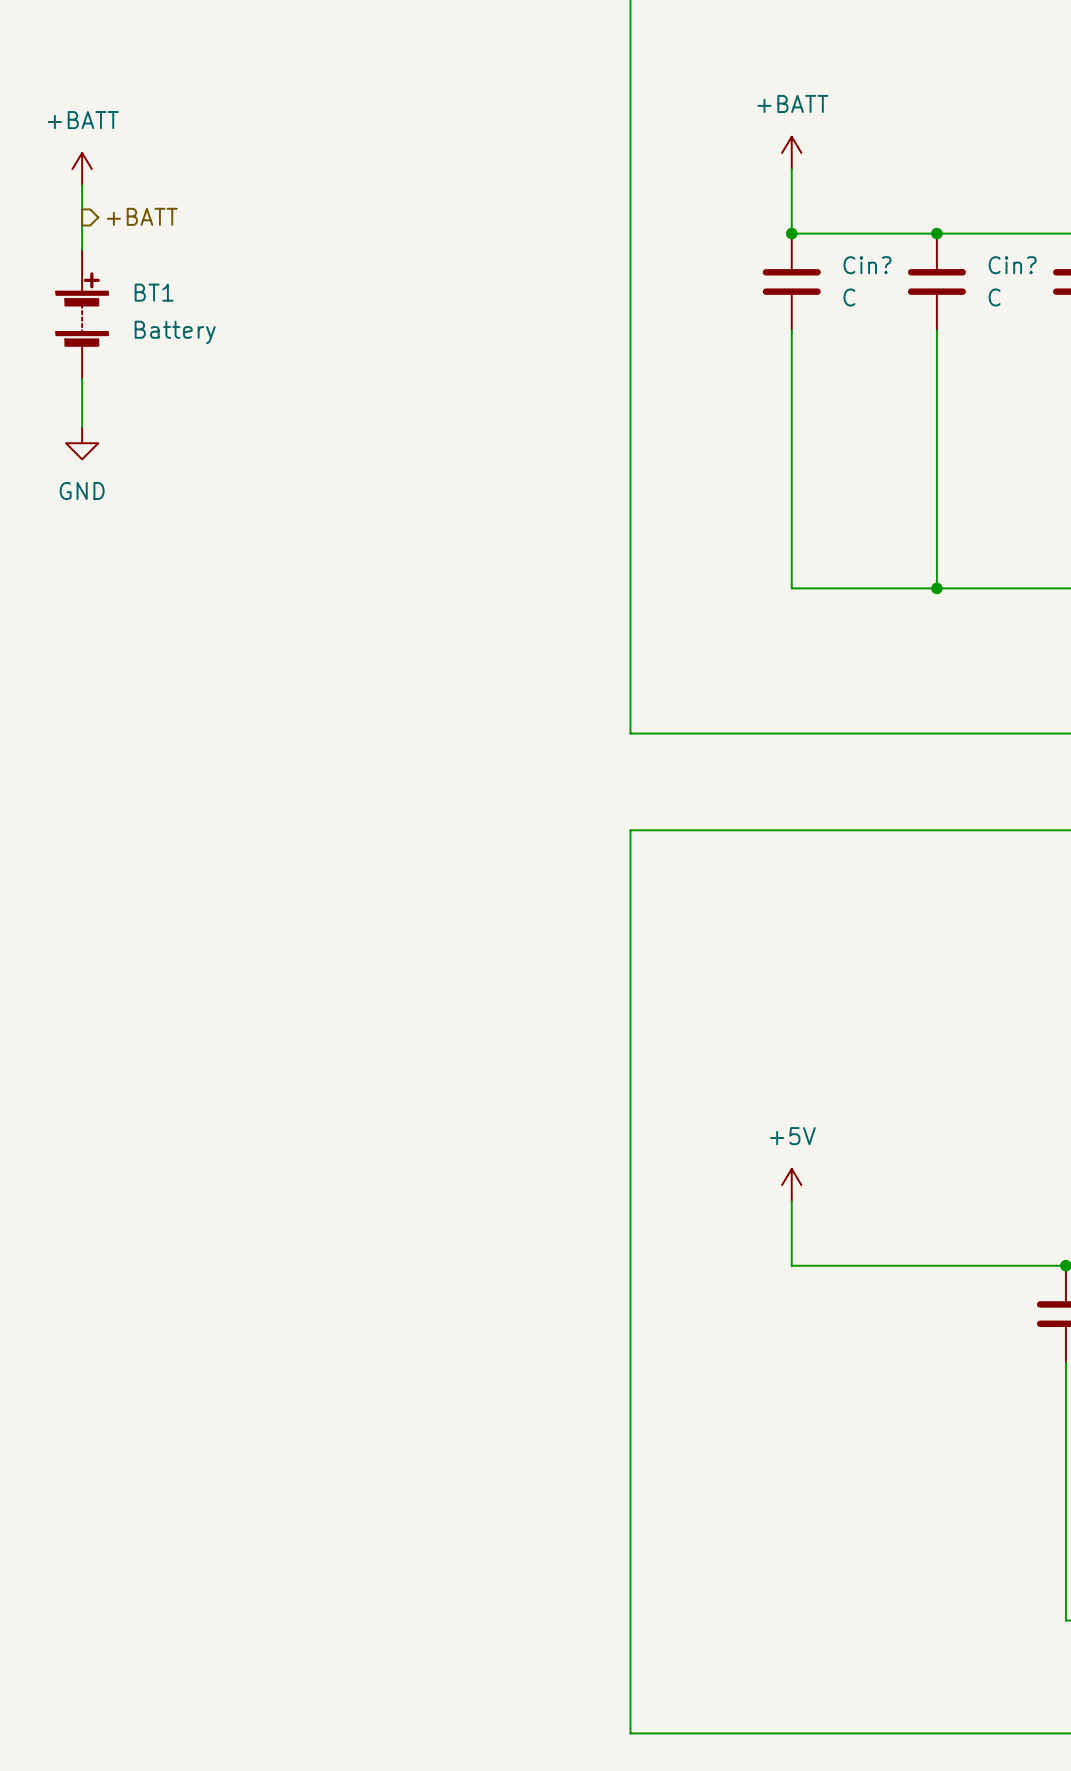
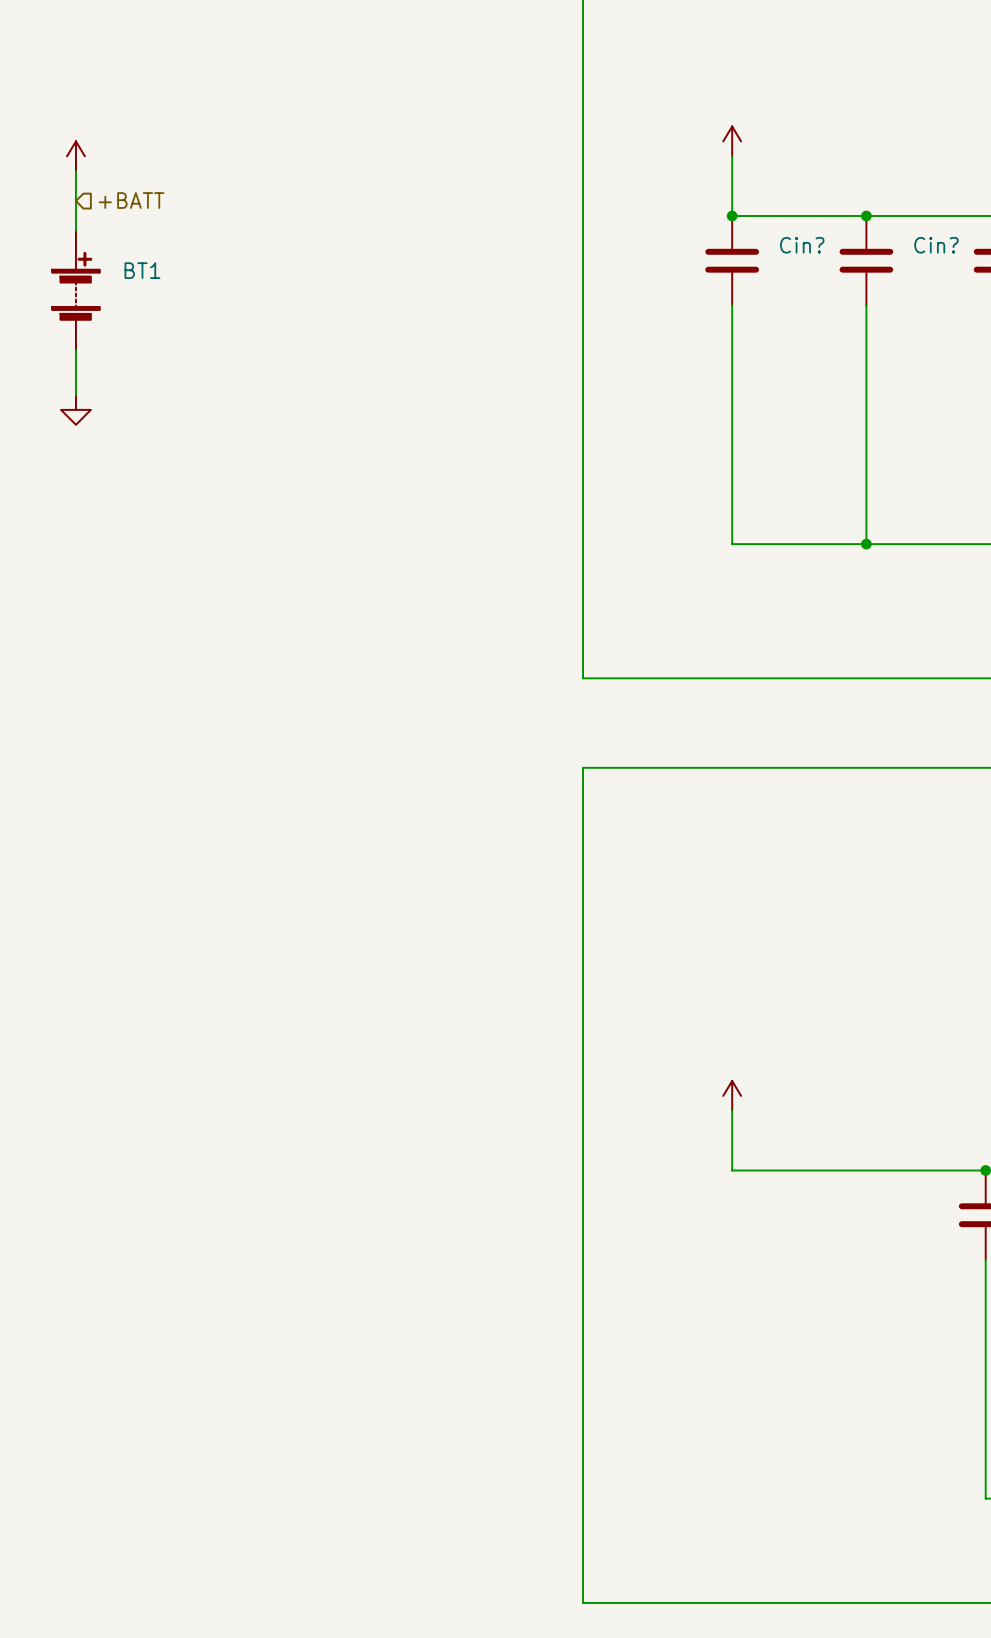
power symbol text: +BATT (792, 103) -> none
power symbol text: +BATT (83, 120) -> none
hierarchical label shape: output (142, 216) -> input (131, 200)
Cin? value: C (849, 297) -> none
Cin? value: C (994, 297) -> none
BT1 value: Battery (175, 332) -> none
power symbol text: GND (82, 491) -> none
power symbol text: +5V (792, 1136) -> none

